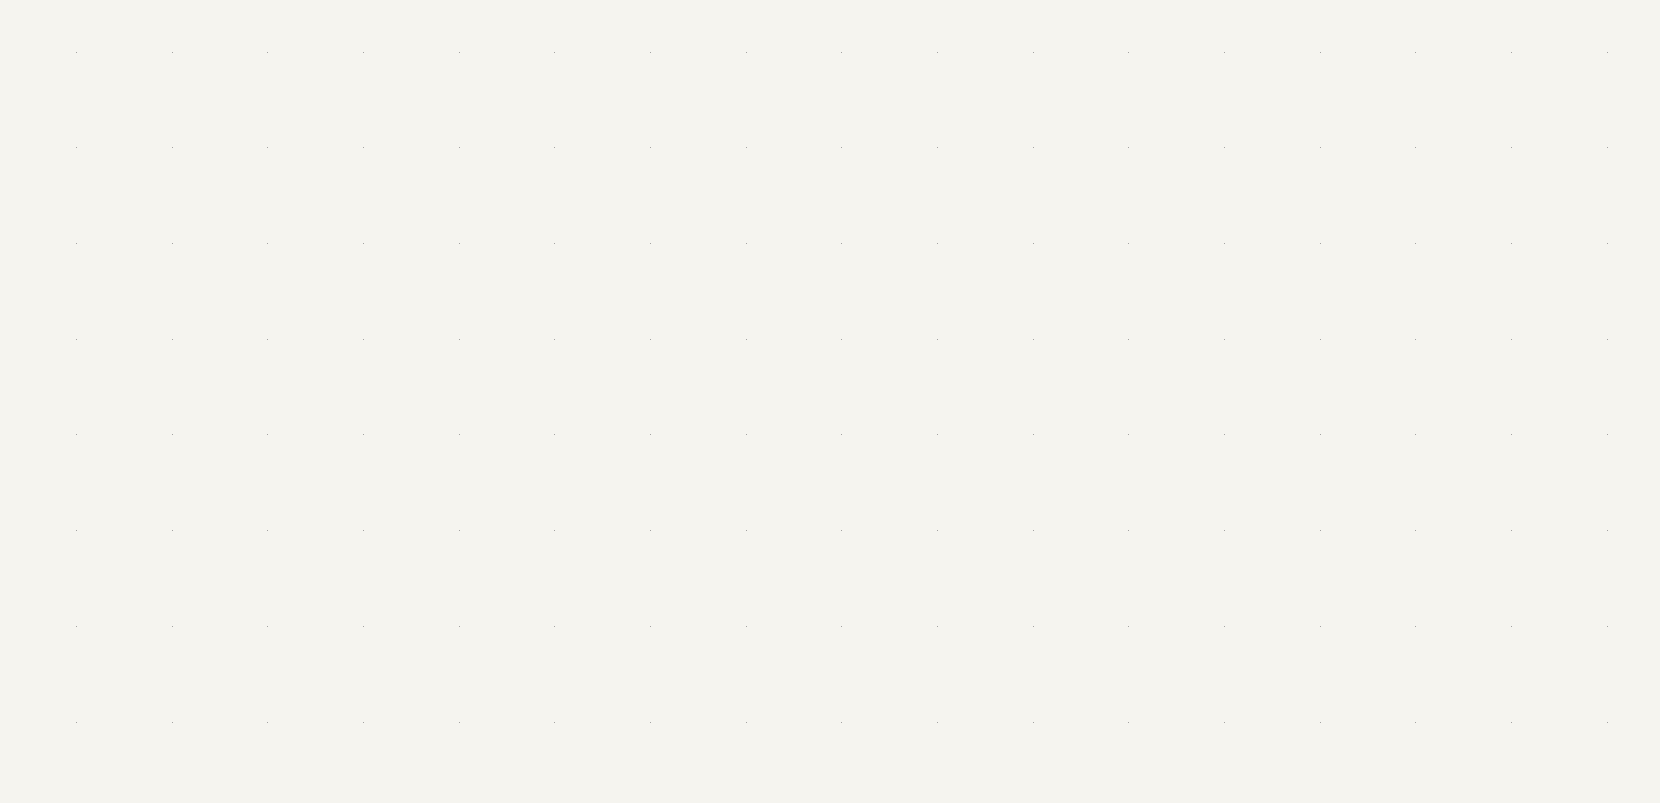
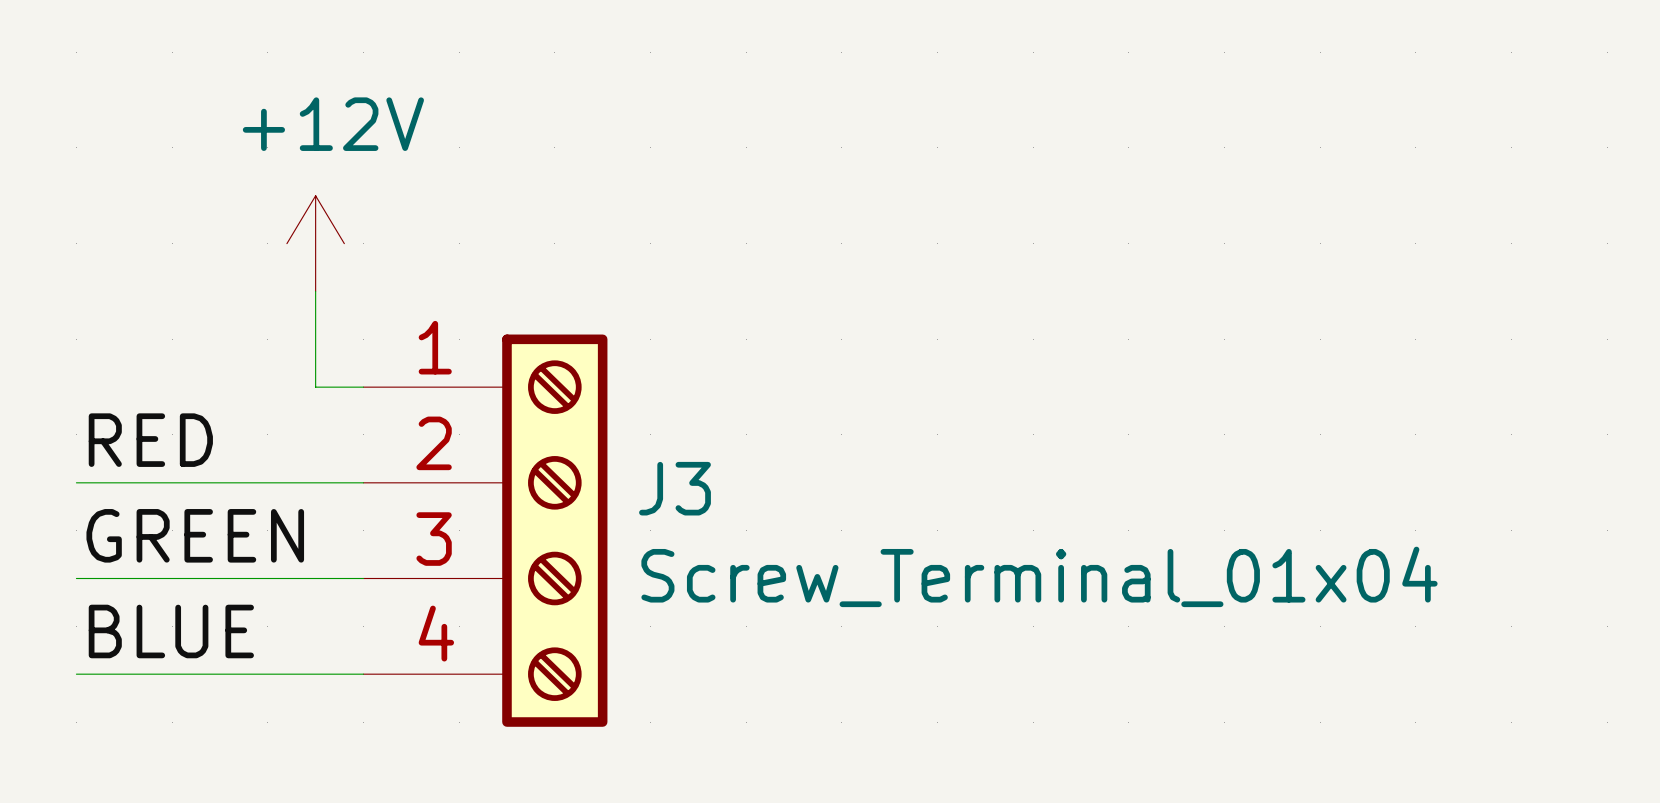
power symbol: none -> +12V (315, 243)
wire: none -> (315, 291) (315, 387) (363, 387)
label: none -> RED (150, 440)
wire: none -> (76, 482) (363, 482)
J3: none -> Screw_Terminal_01x04 (485, 530)
label: none -> GREEN (195, 535)
wire: none -> (76, 578) (363, 578)
label: none -> BLUE (171, 631)
wire: none -> (76, 674) (363, 674)

